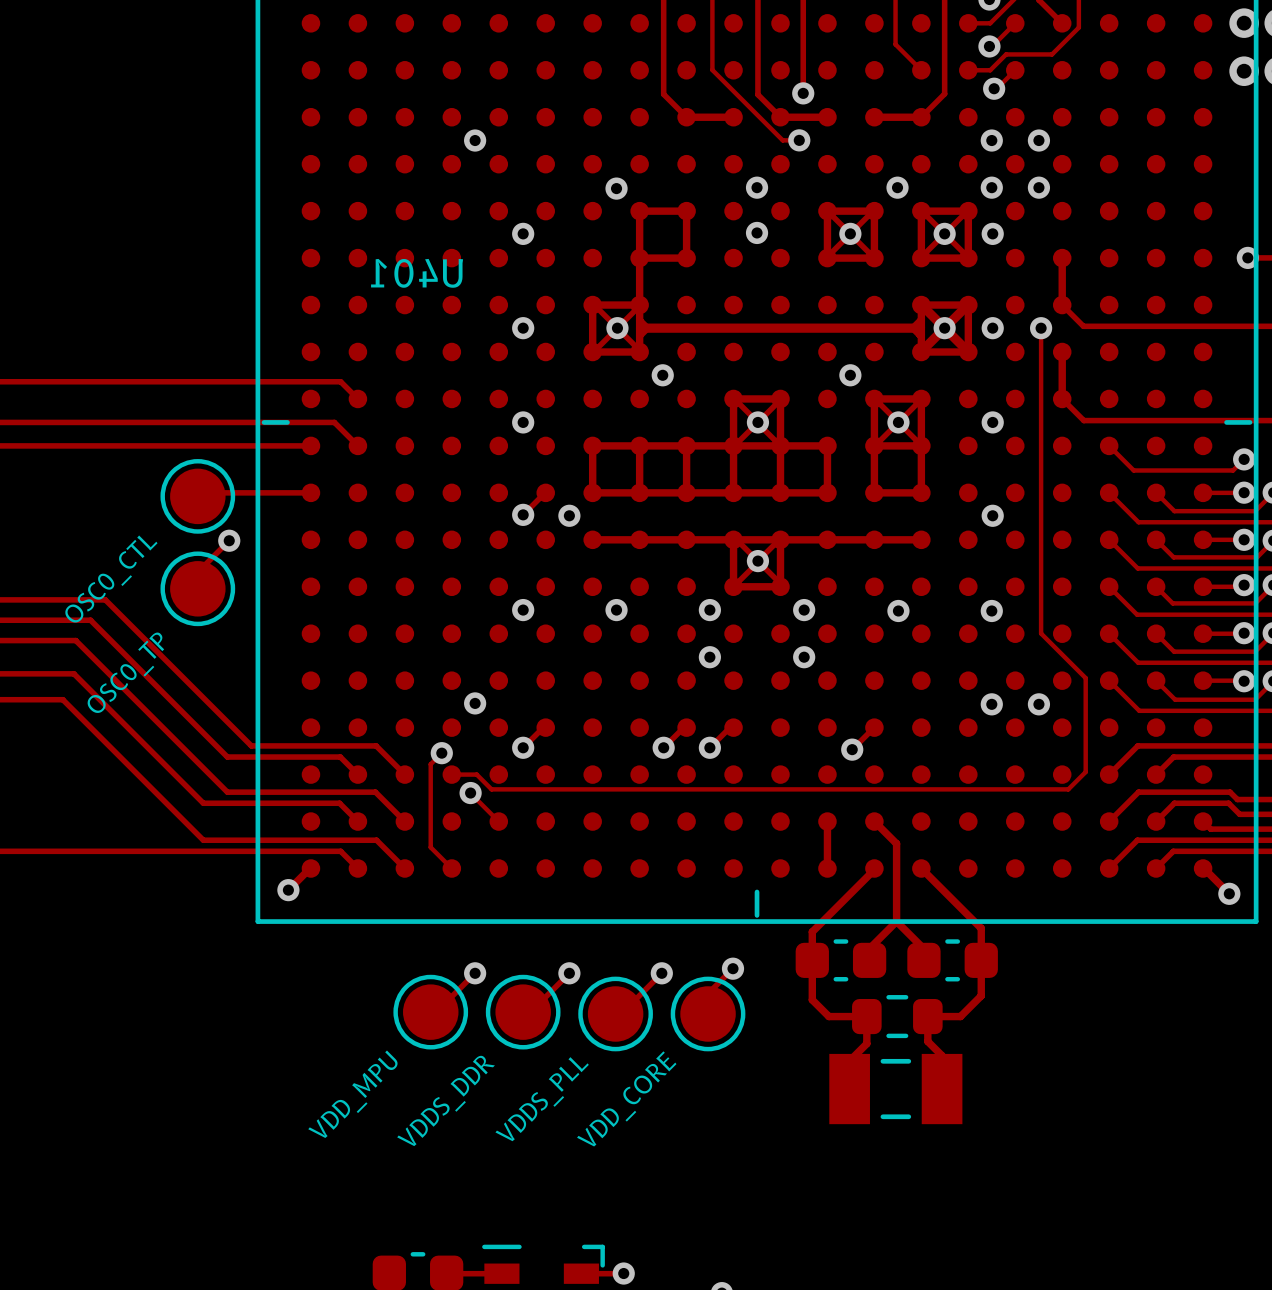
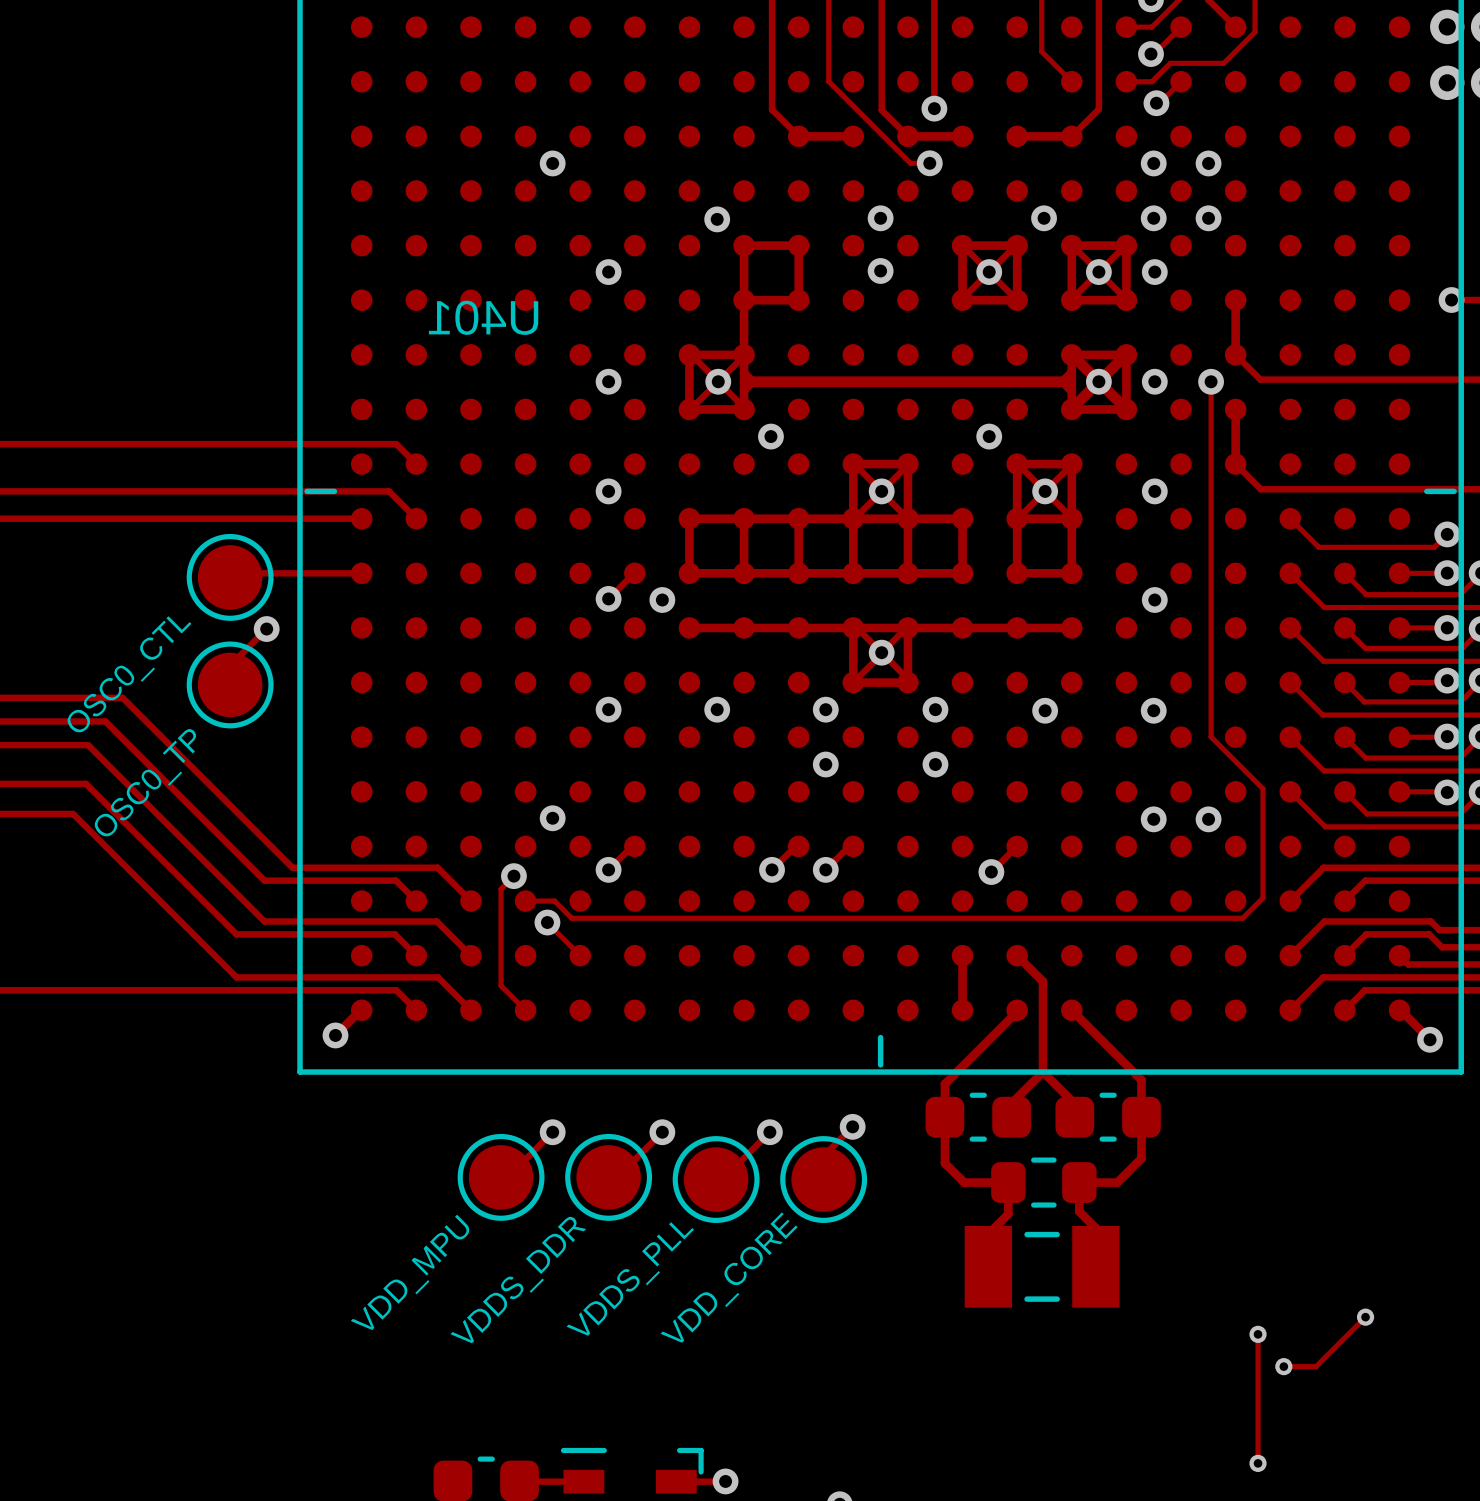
track: none -> (1365, 1317) (1316, 1366) (1283, 1366)
via: none -> (1365, 1317)
track: none -> (1258, 1334) (1258, 1463)
via: none -> (1258, 1334)
via: none -> (1283, 1366)
via: none -> (1258, 1463)

